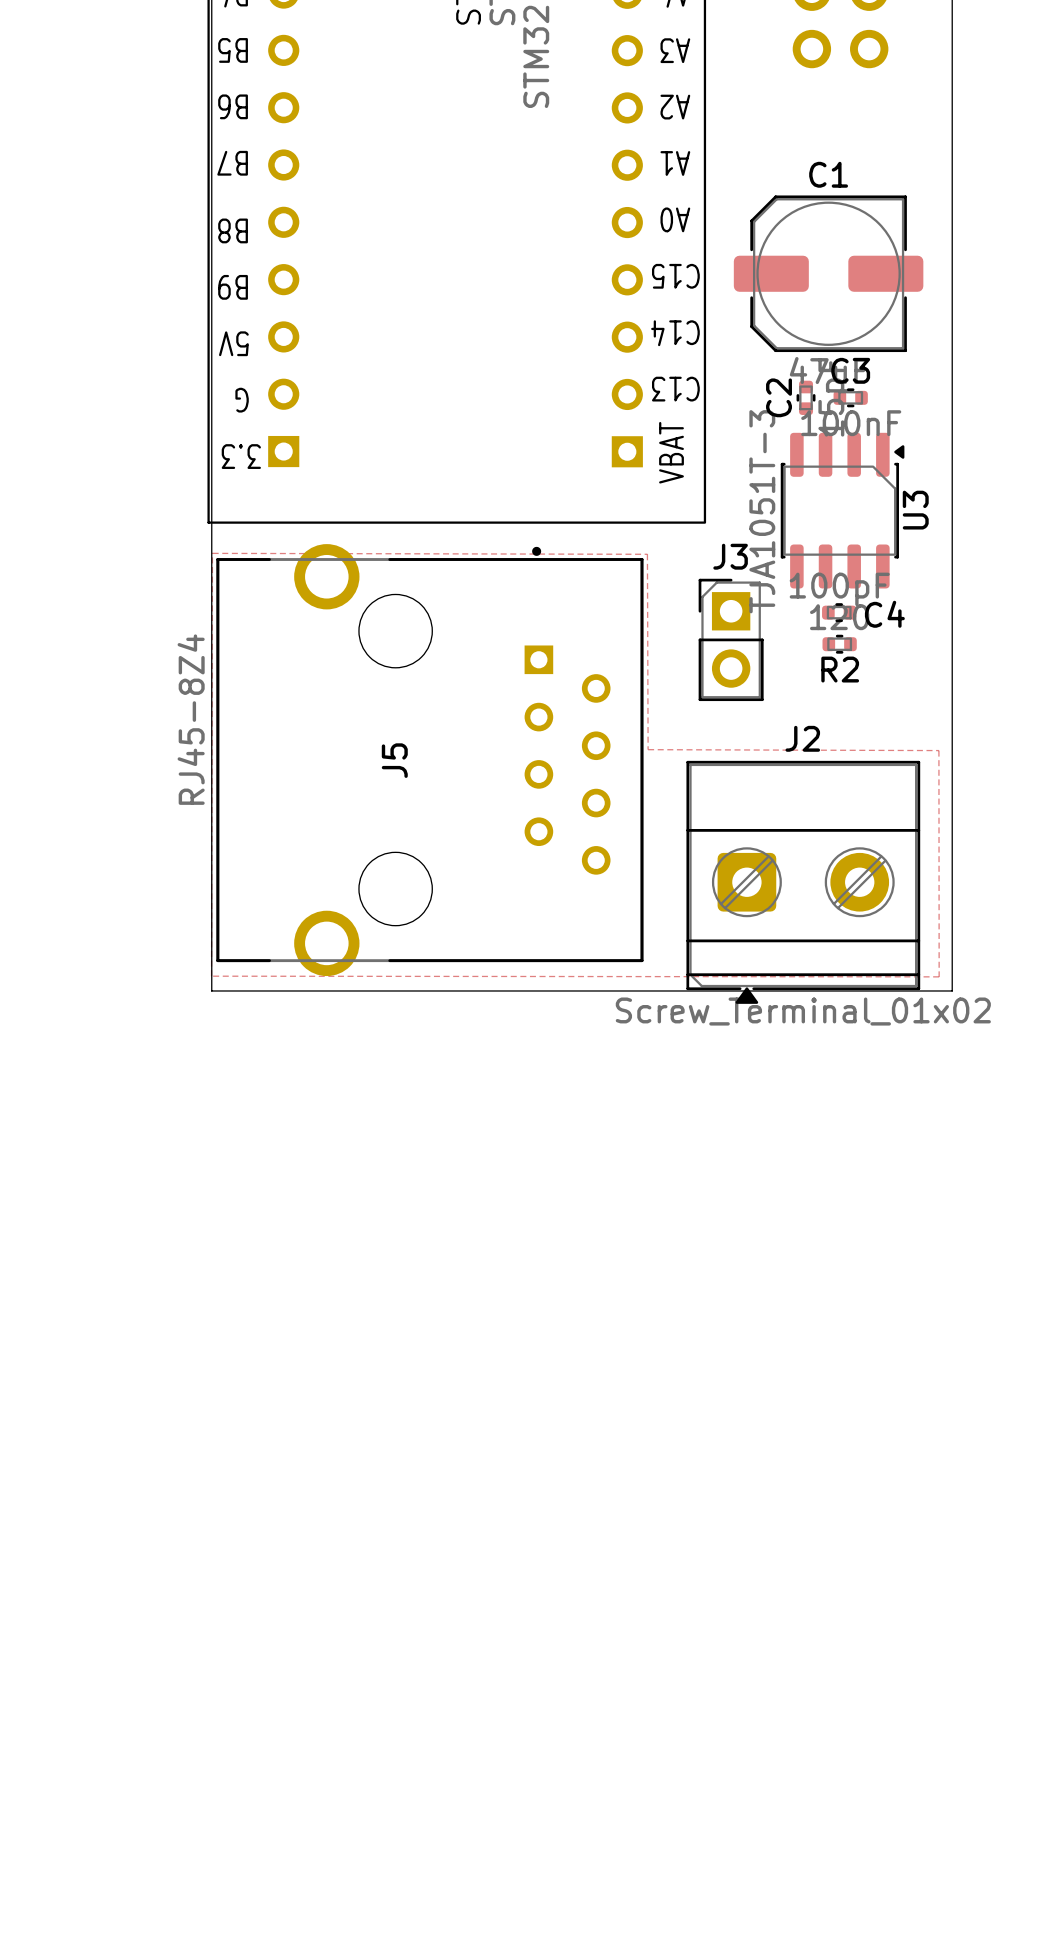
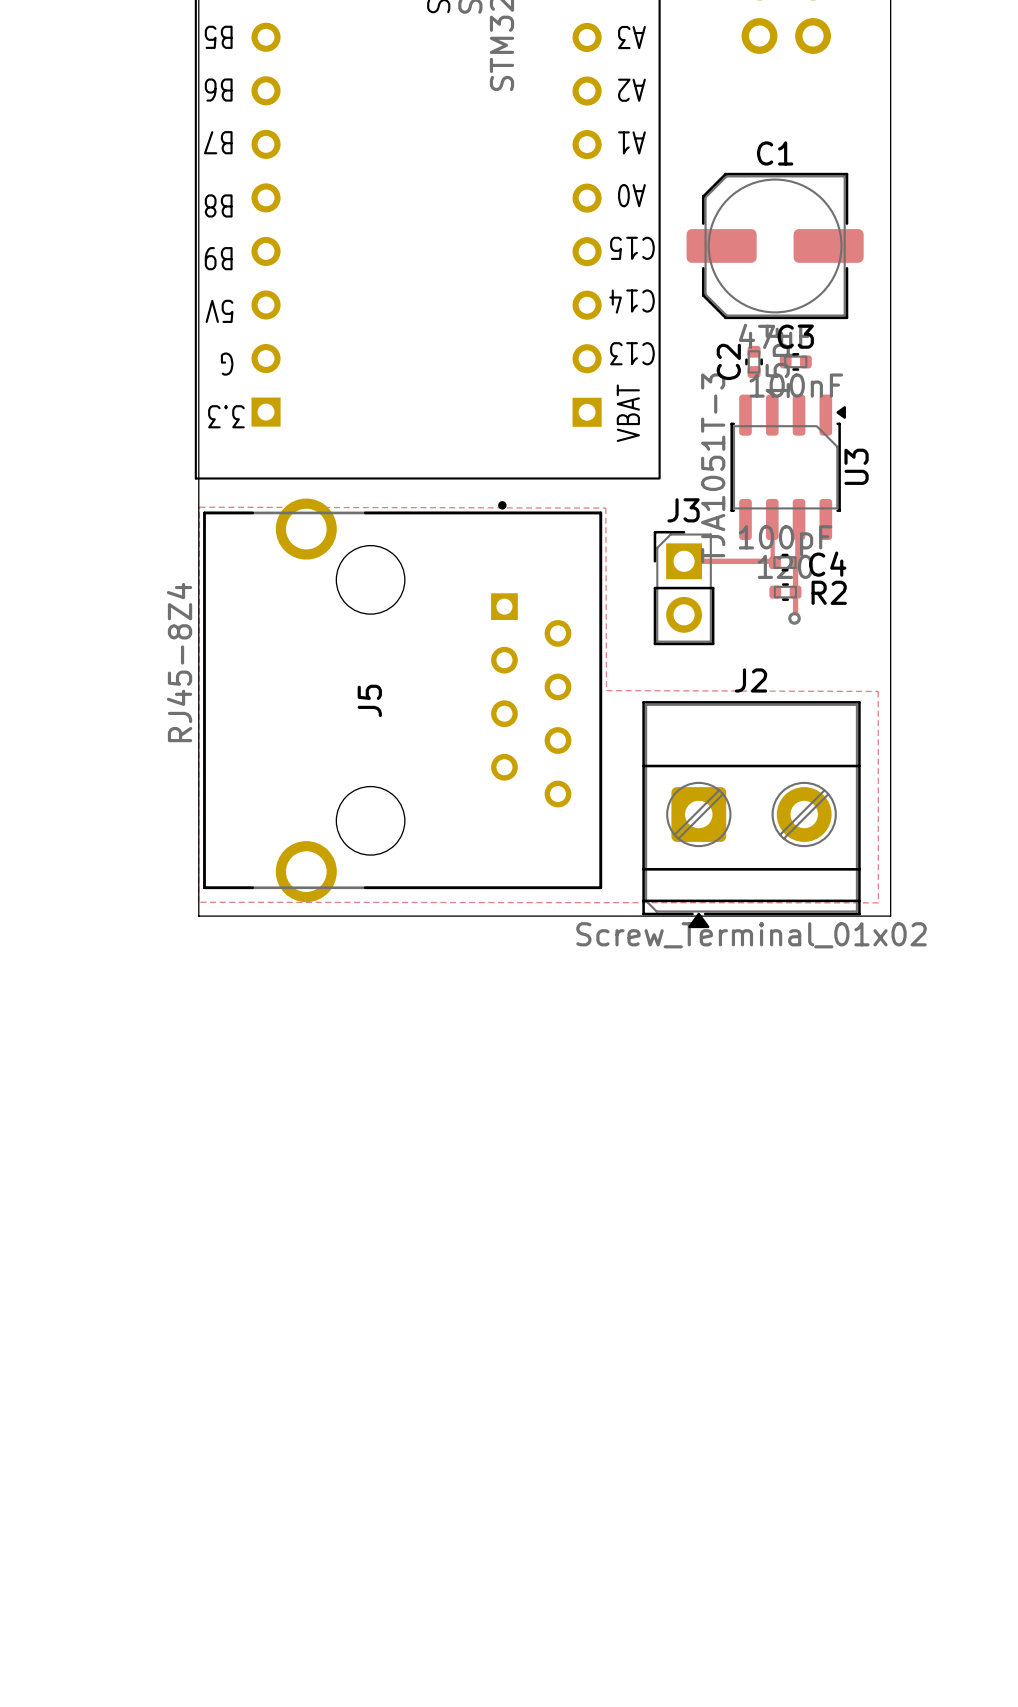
track: none -> (772, 519) (772, 557) (777, 562) (684, 561)
track: none -> (799, 519) (797, 520) (797, 562) (795, 564) (794, 618)
R2 name position: R2 (840, 669) -> R2 (829, 592)
via: none -> (794, 618)

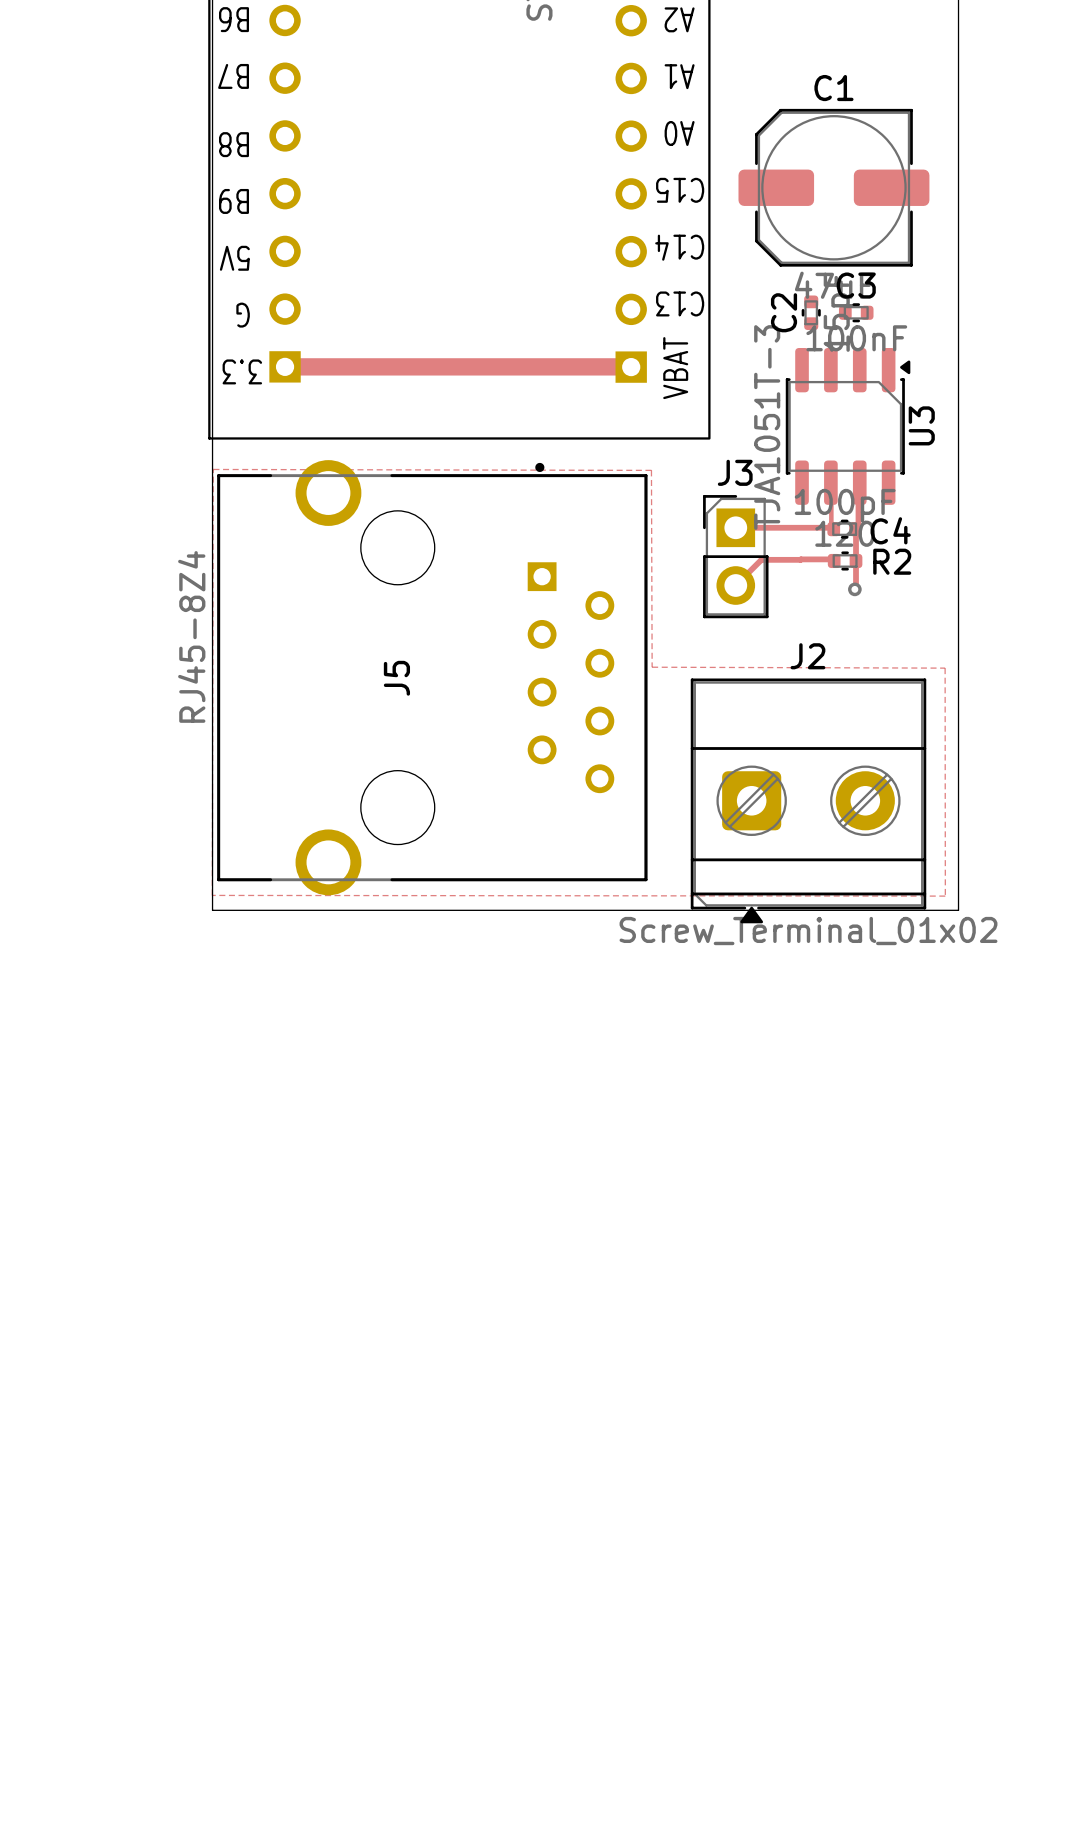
track: none -> (285, 366) (630, 366)
track: none -> (832, 559) (761, 559) (735, 585)

